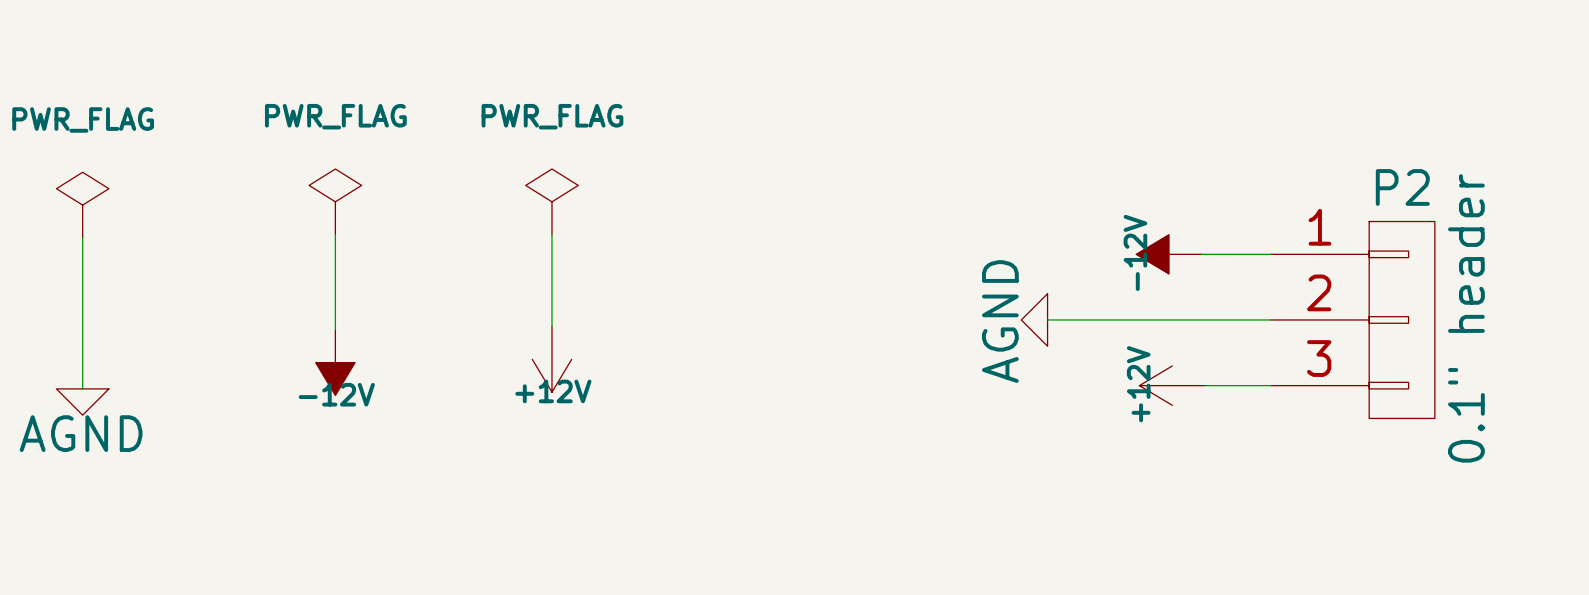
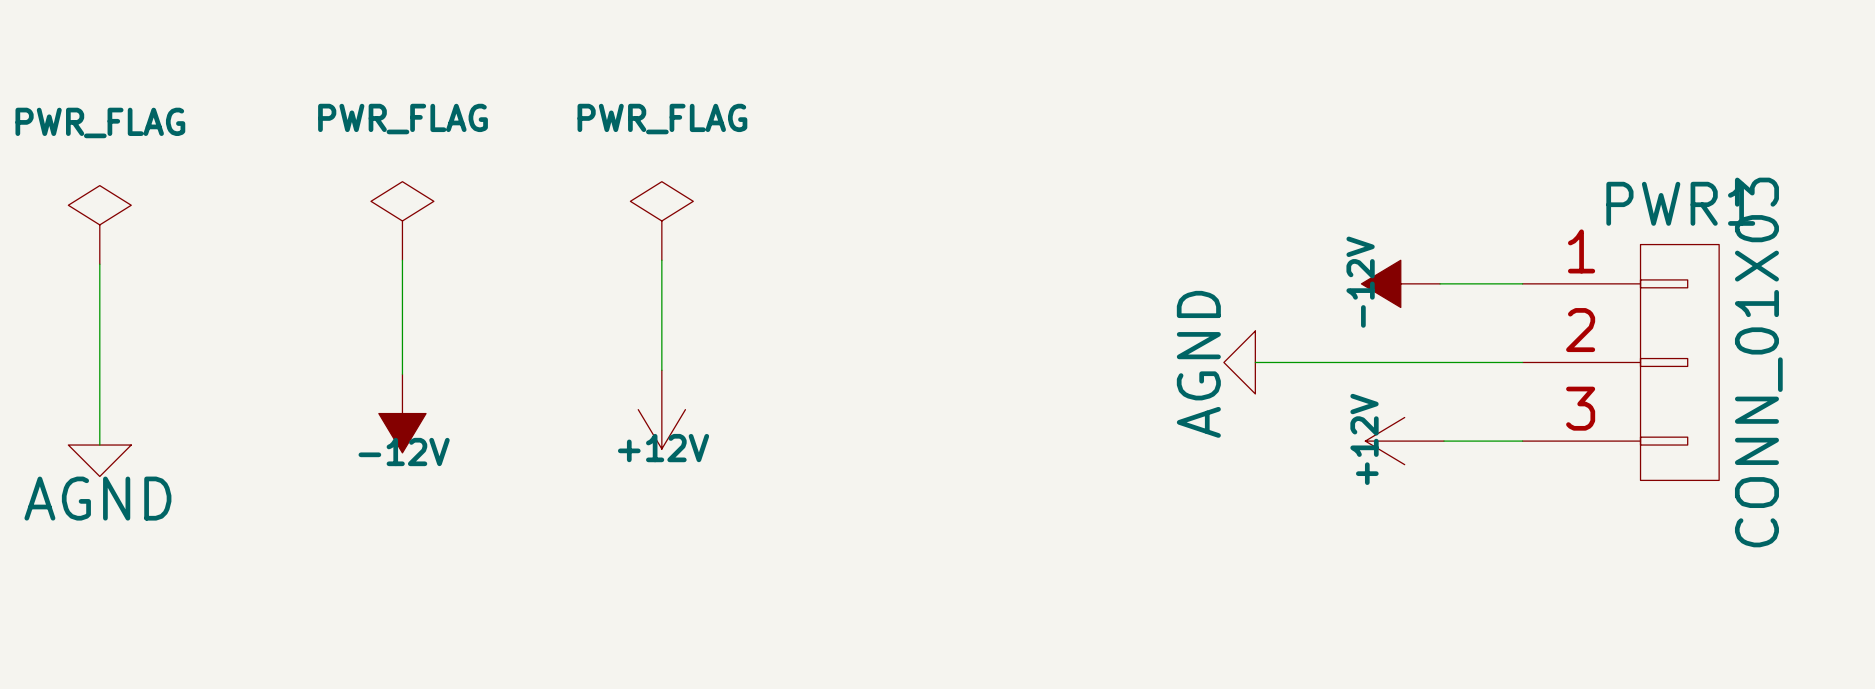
P2 name: P2 (1402, 187) -> PWR1 (1680, 203)
P2 value: 0.1" header (1466, 318) -> CONN_01X03 (1758, 362)

